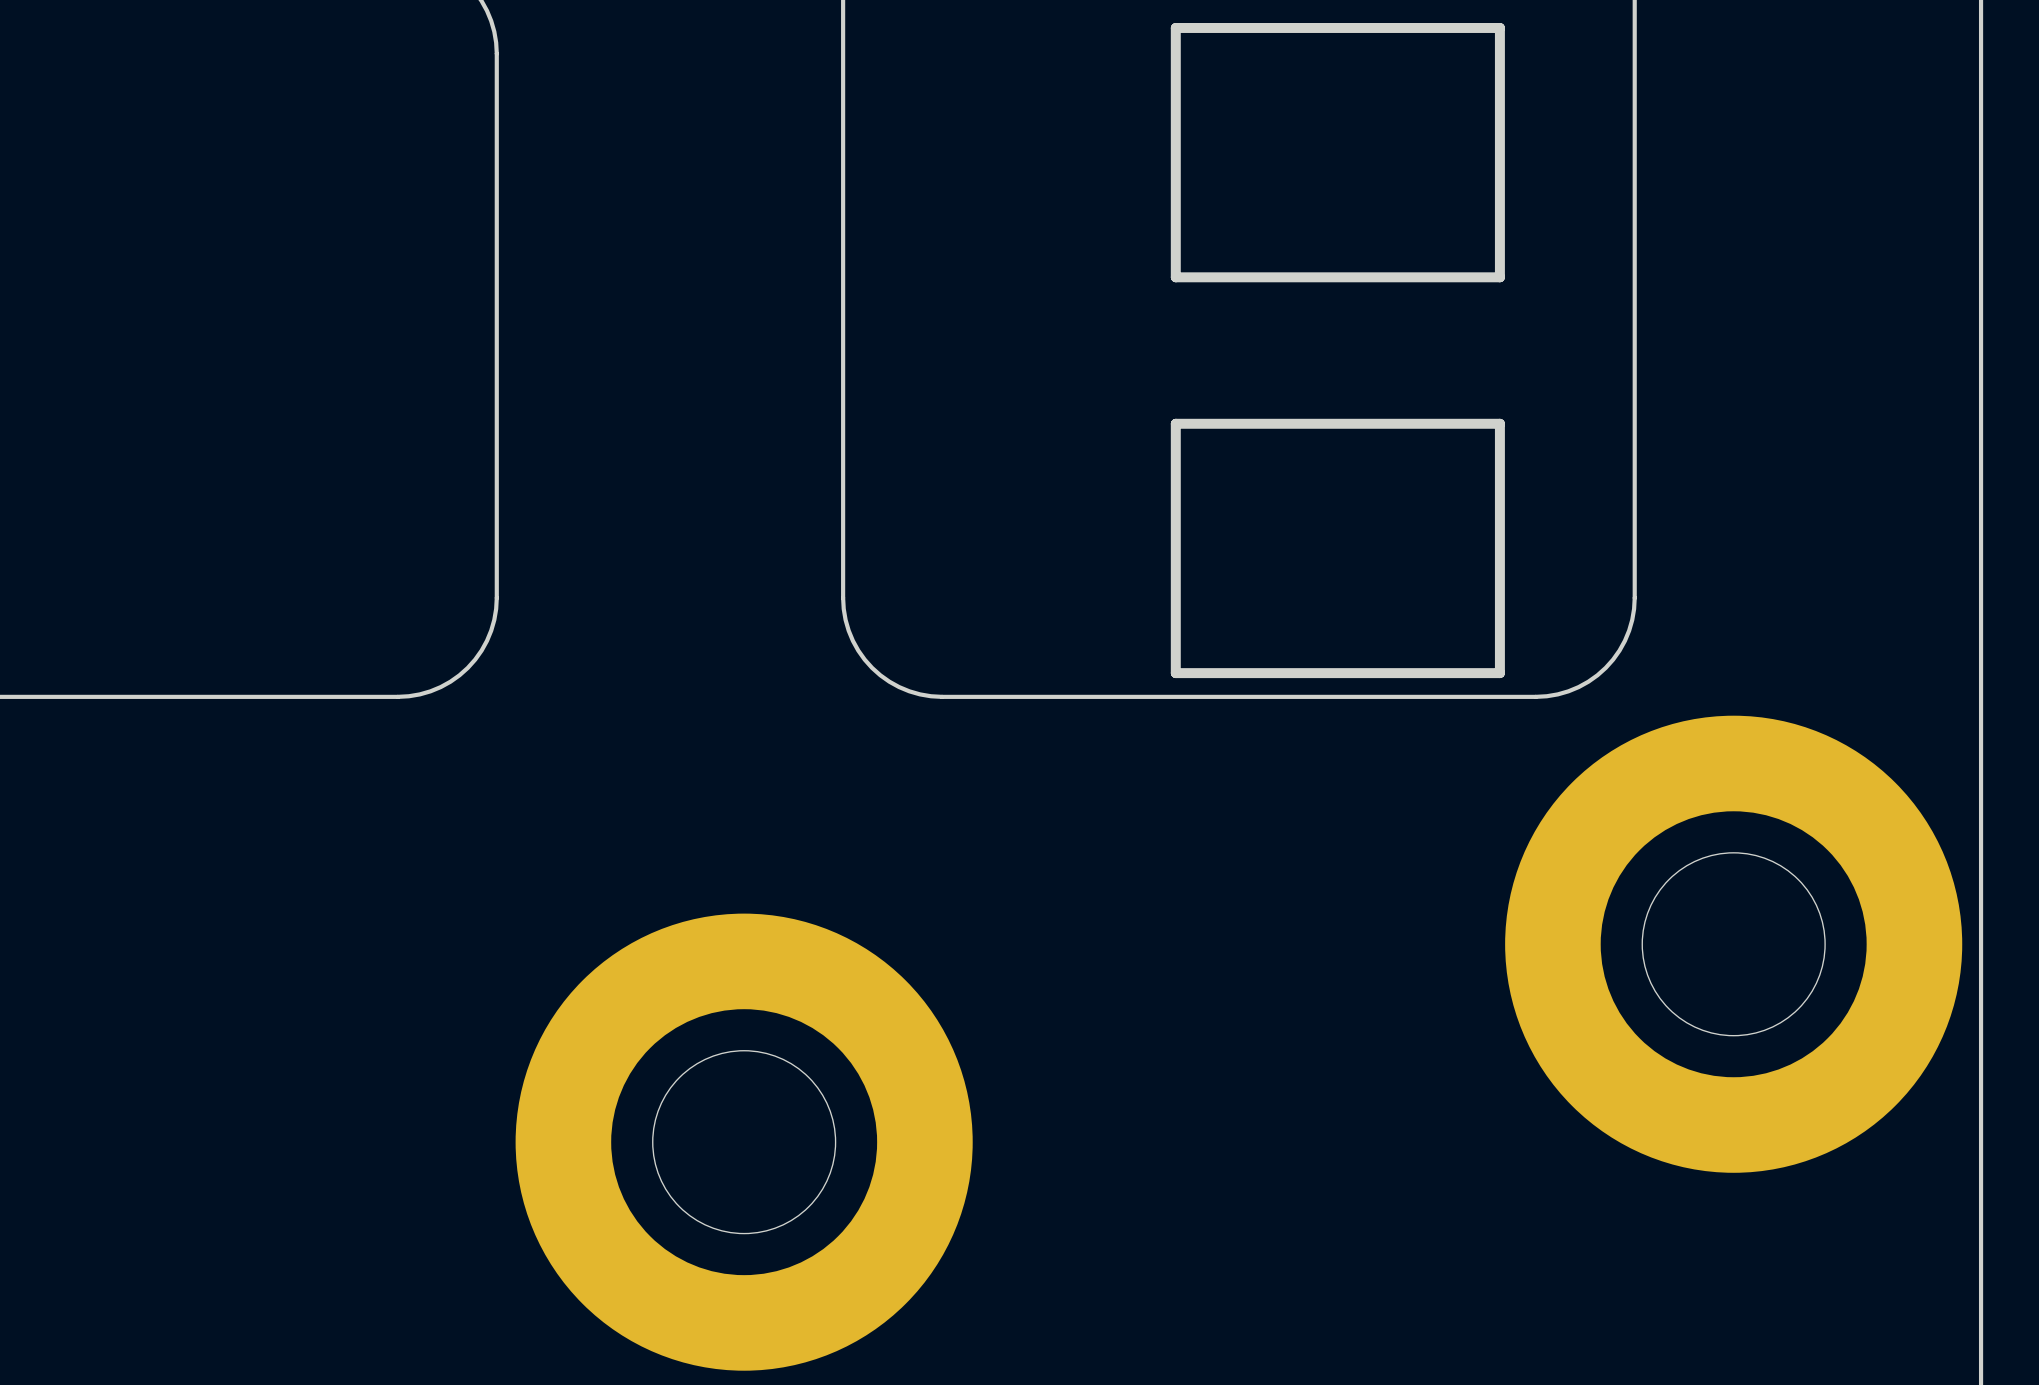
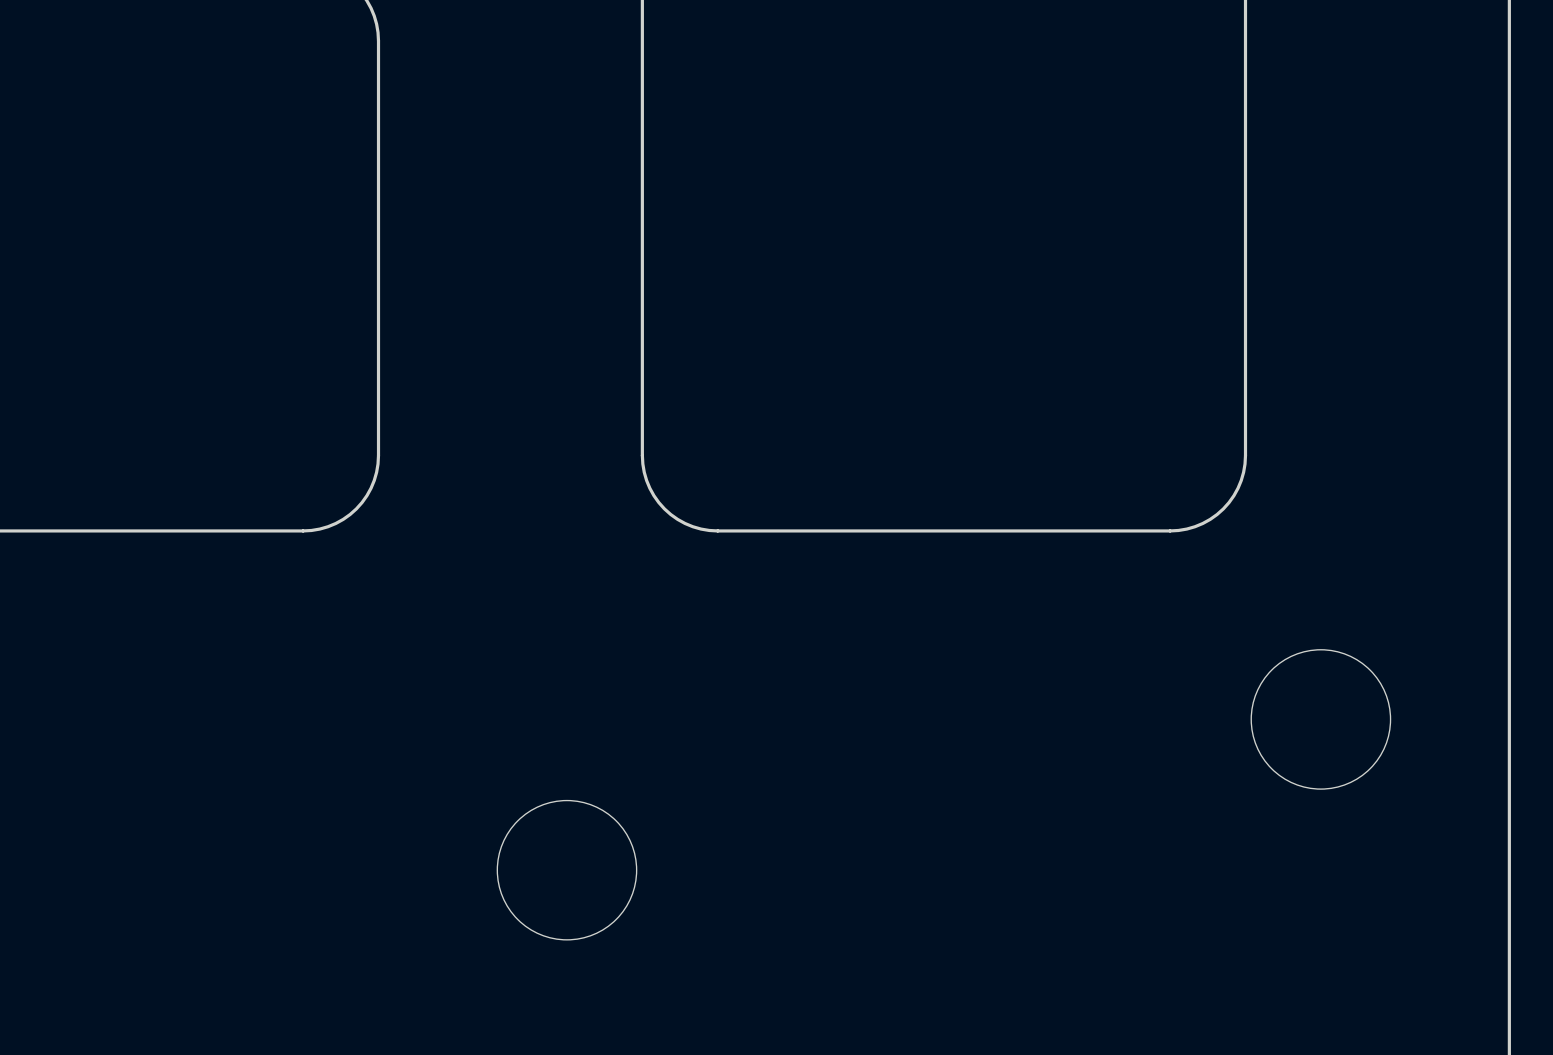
part: (1337, 152) -> none
part: (1337, 548) -> none
part: (1733, 944) -> none
part: (744, 1142) -> none

